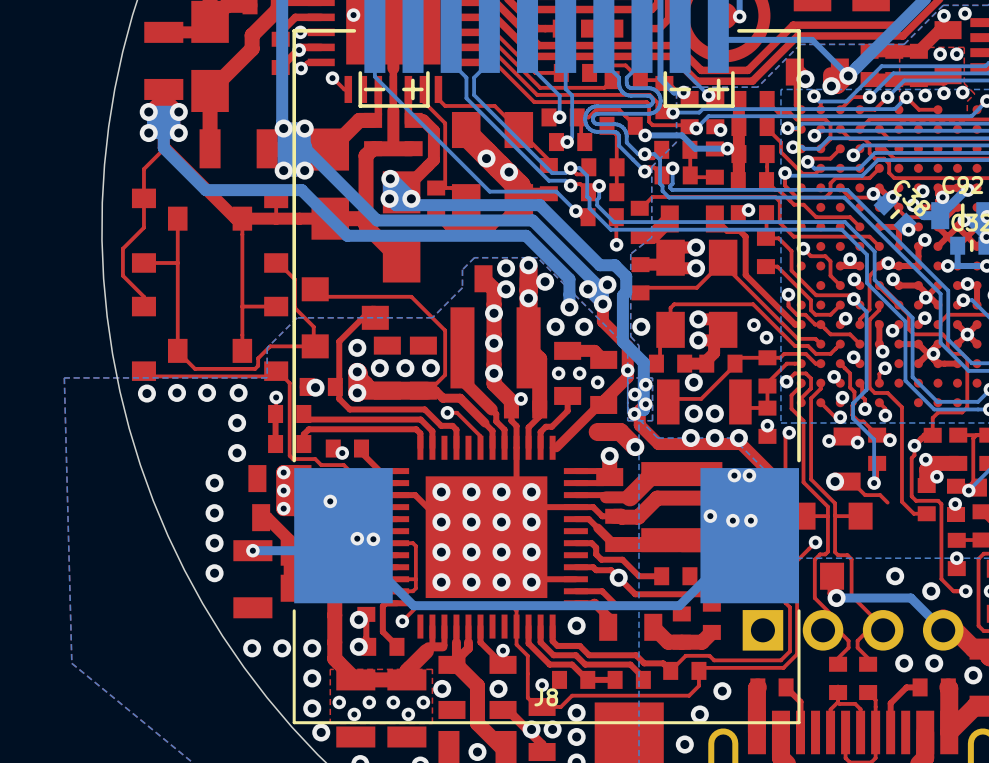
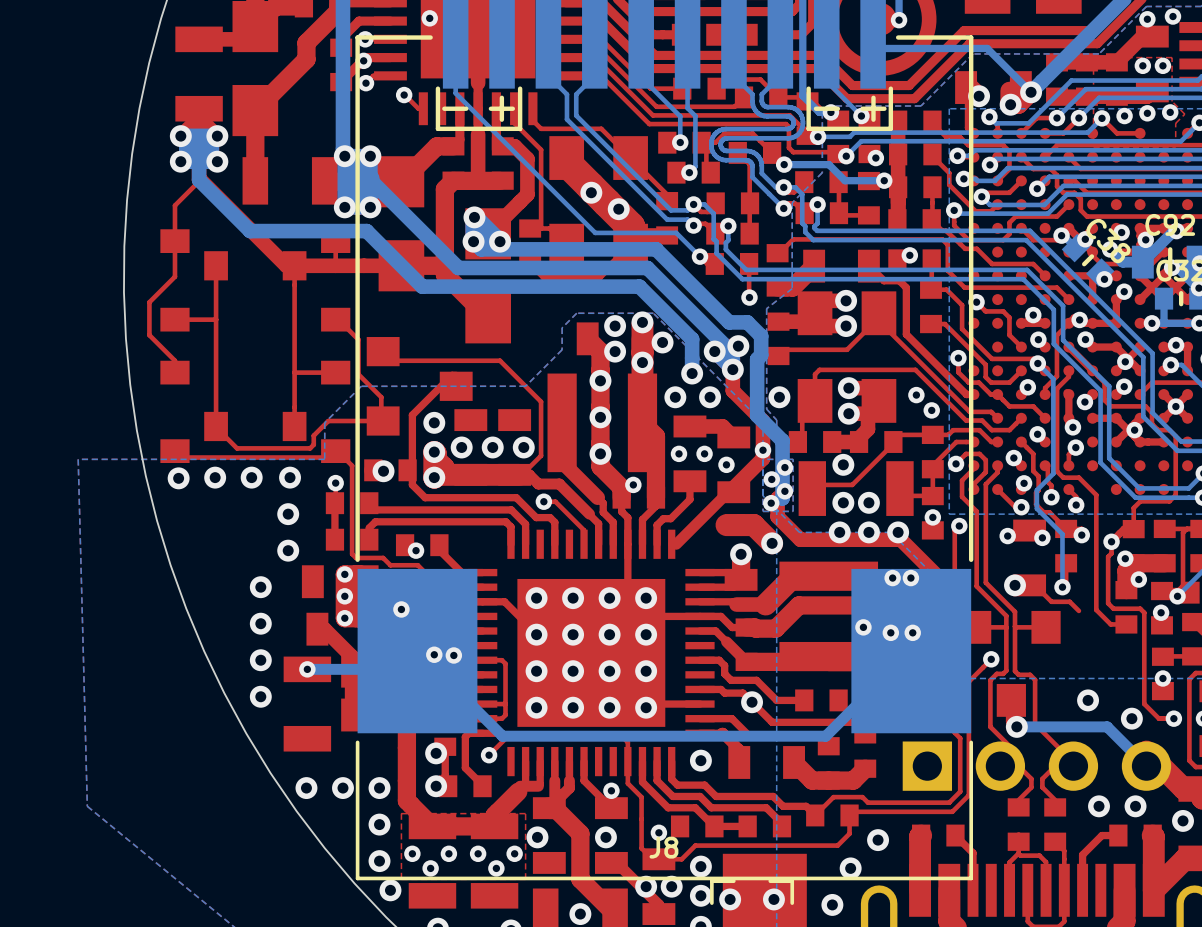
line: none -> (733, 881) (711, 881) (711, 903)
line: none -> (770, 881) (792, 881) (792, 903)
via: none -> (730, 899)
via: none -> (773, 899)

